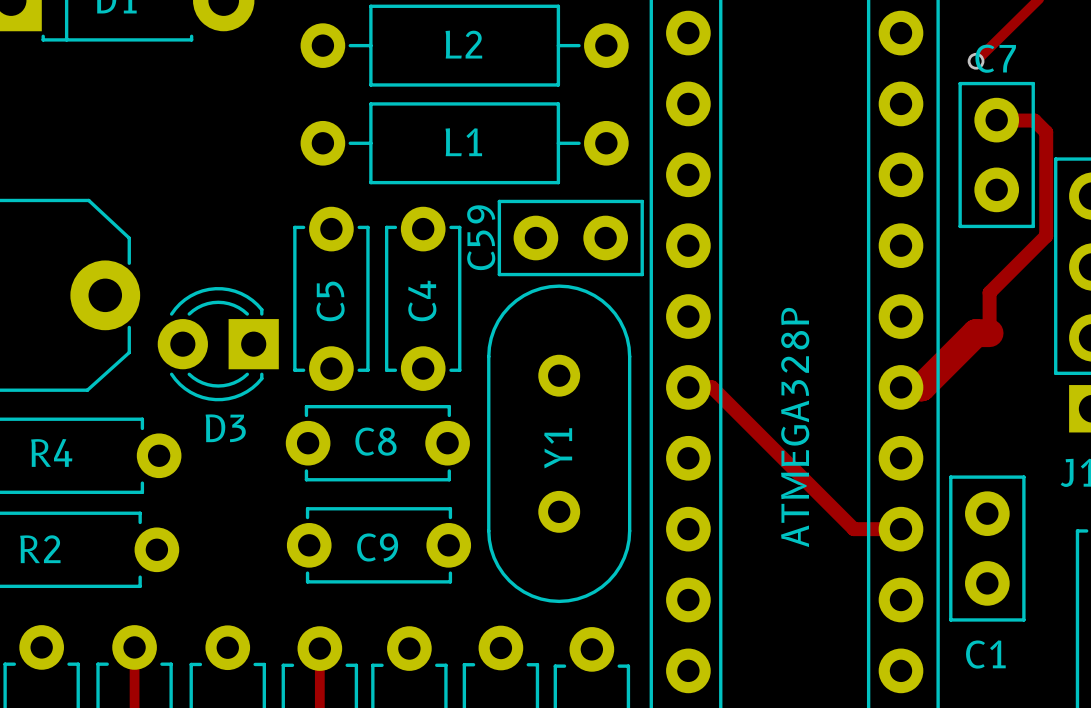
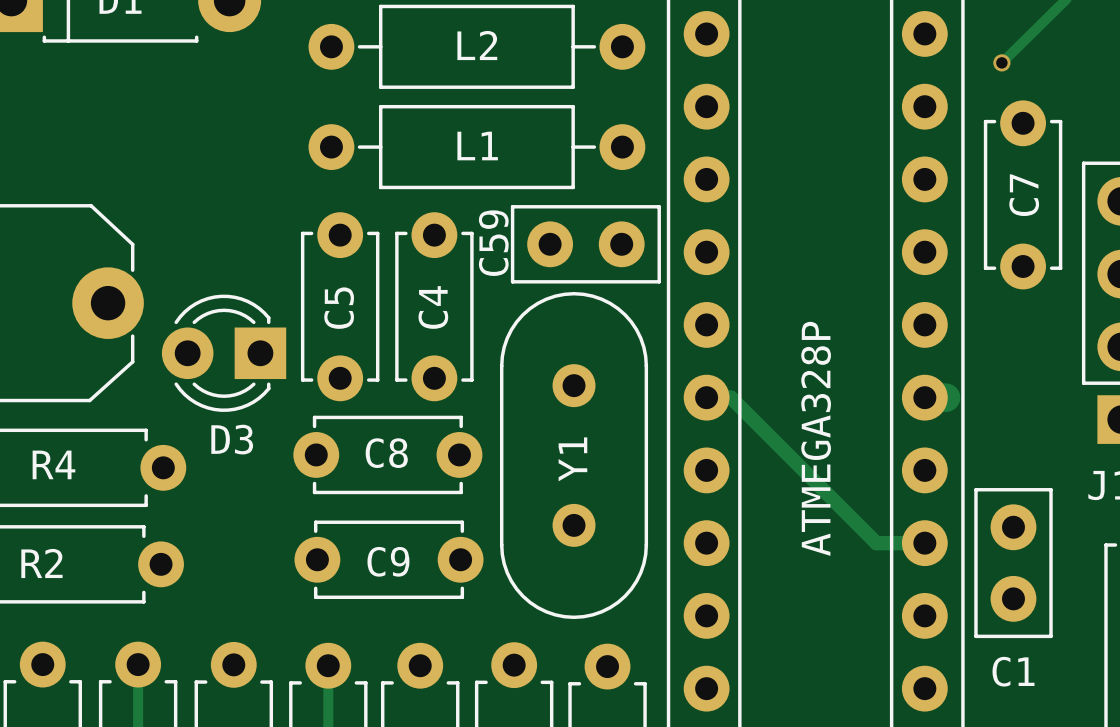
C7 name position: C7 (995, 58) -> C7 (1024, 195)
C7 footprint: [958, 81, 1035, 229] -> [983, 100, 1063, 290]
track: (997, 120) (1034, 120) (1046, 132) (1046, 236) (989, 292) (989, 333) (975, 333) (921, 387) -> none

